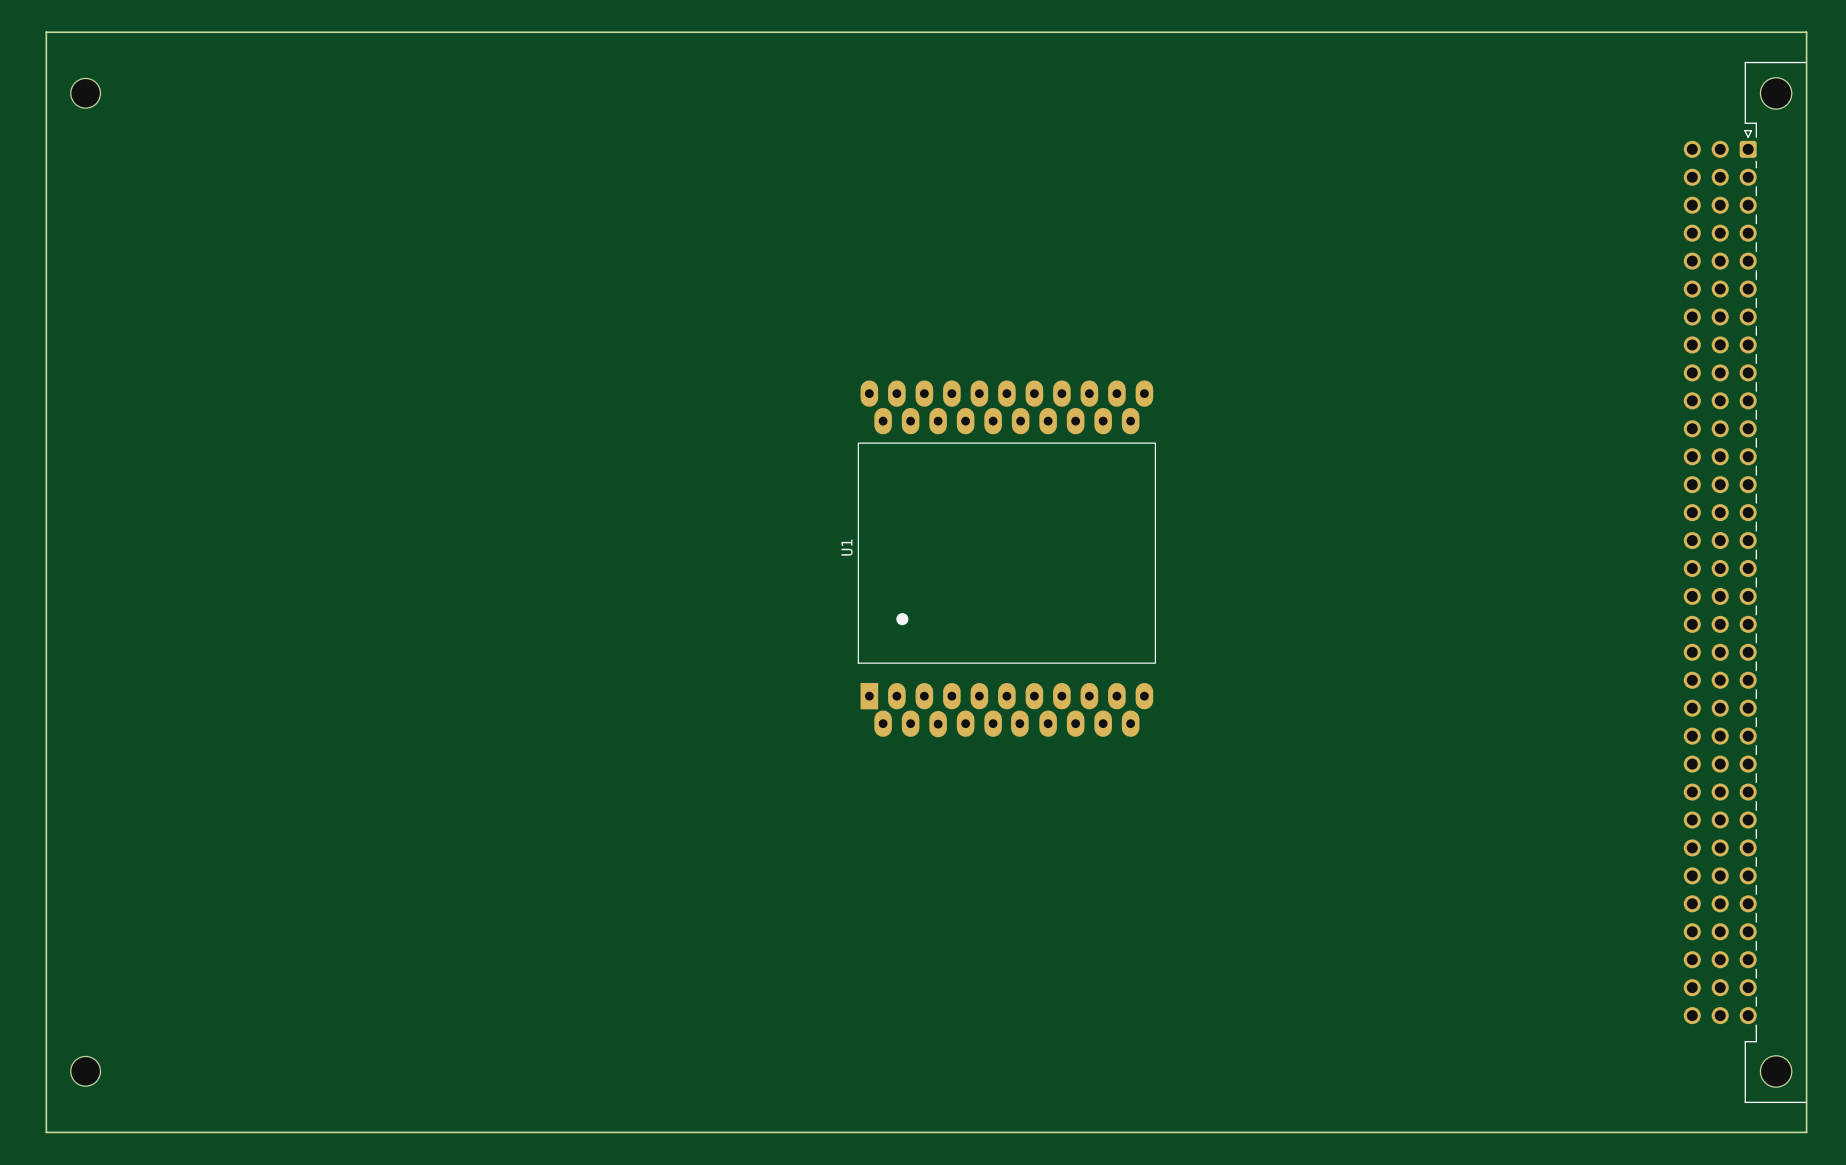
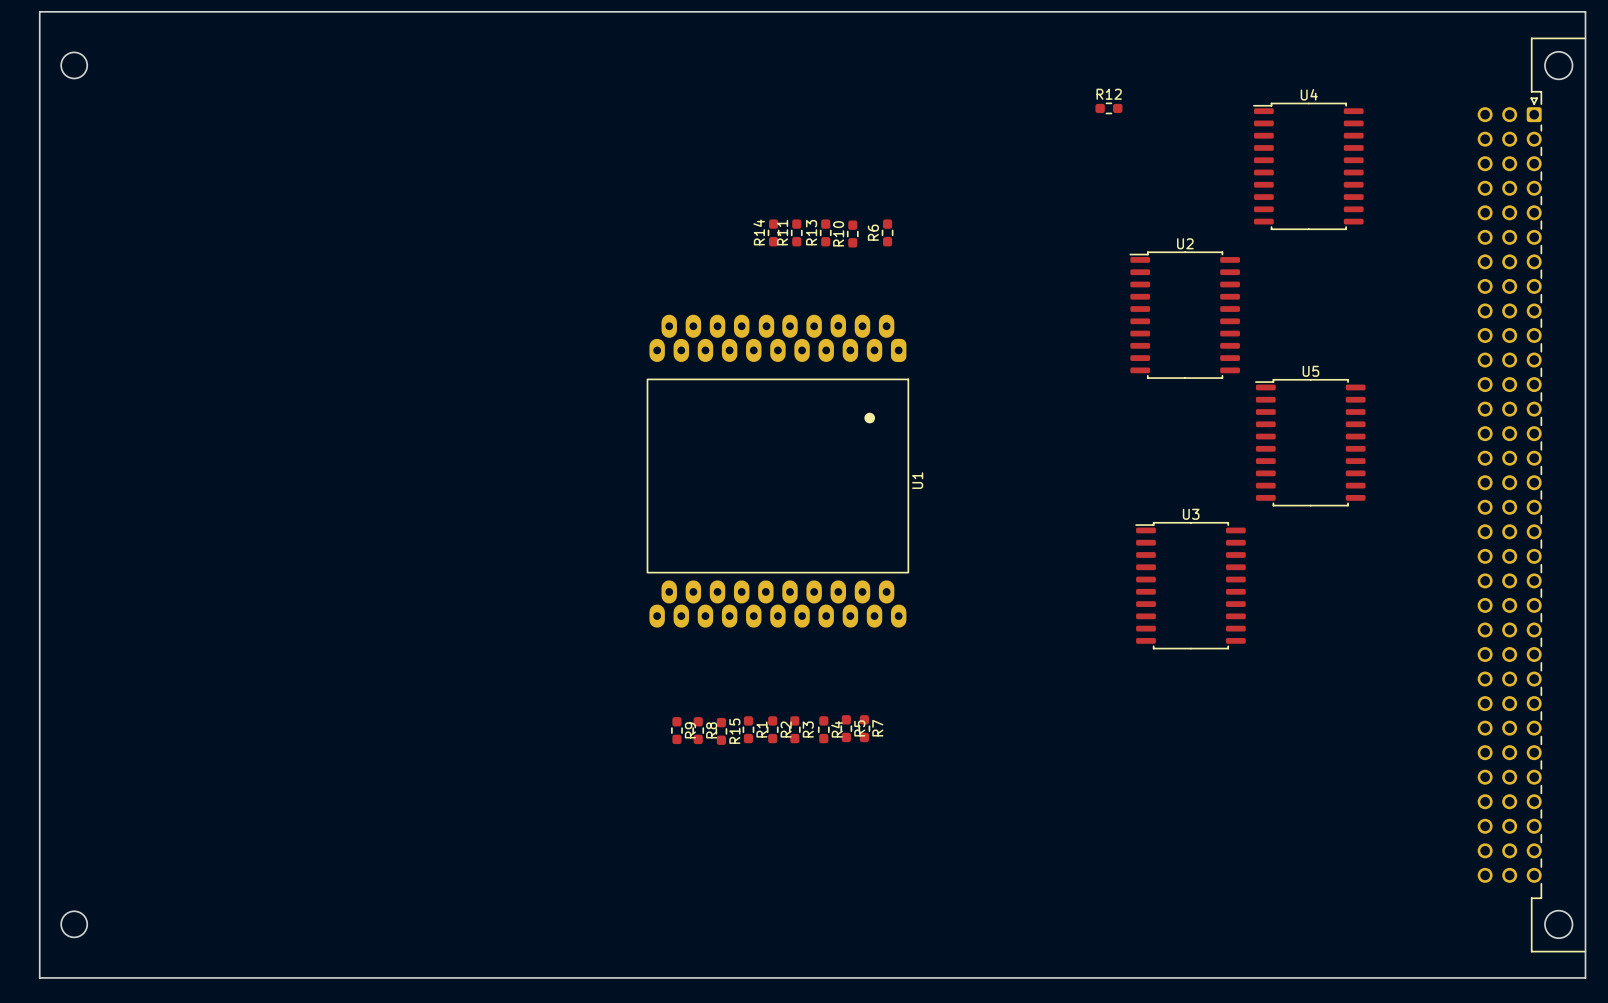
R12: none -> (1108, 108)
U4: none -> (1308, 166)
R14: none -> (773, 232)
R11: none -> (796, 232)
R13: none -> (825, 232)
R6: none -> (887, 232)
R10: none -> (852, 234)
U2: none -> (1184, 315)
U1 footprint: [857, 380, 1156, 738] -> [647, 314, 909, 628]
U5: none -> (1310, 442)
U1 name position: U1 (847, 547) -> U1 (917, 480)
U3: none -> (1190, 585)
R5: none -> (846, 728)
R7: none -> (864, 728)
R1: none -> (748, 729)
R2: none -> (772, 729)
R3: none -> (794, 729)
R4: none -> (823, 729)
R9: none -> (676, 730)
R8: none -> (698, 730)
R15: none -> (721, 731)

